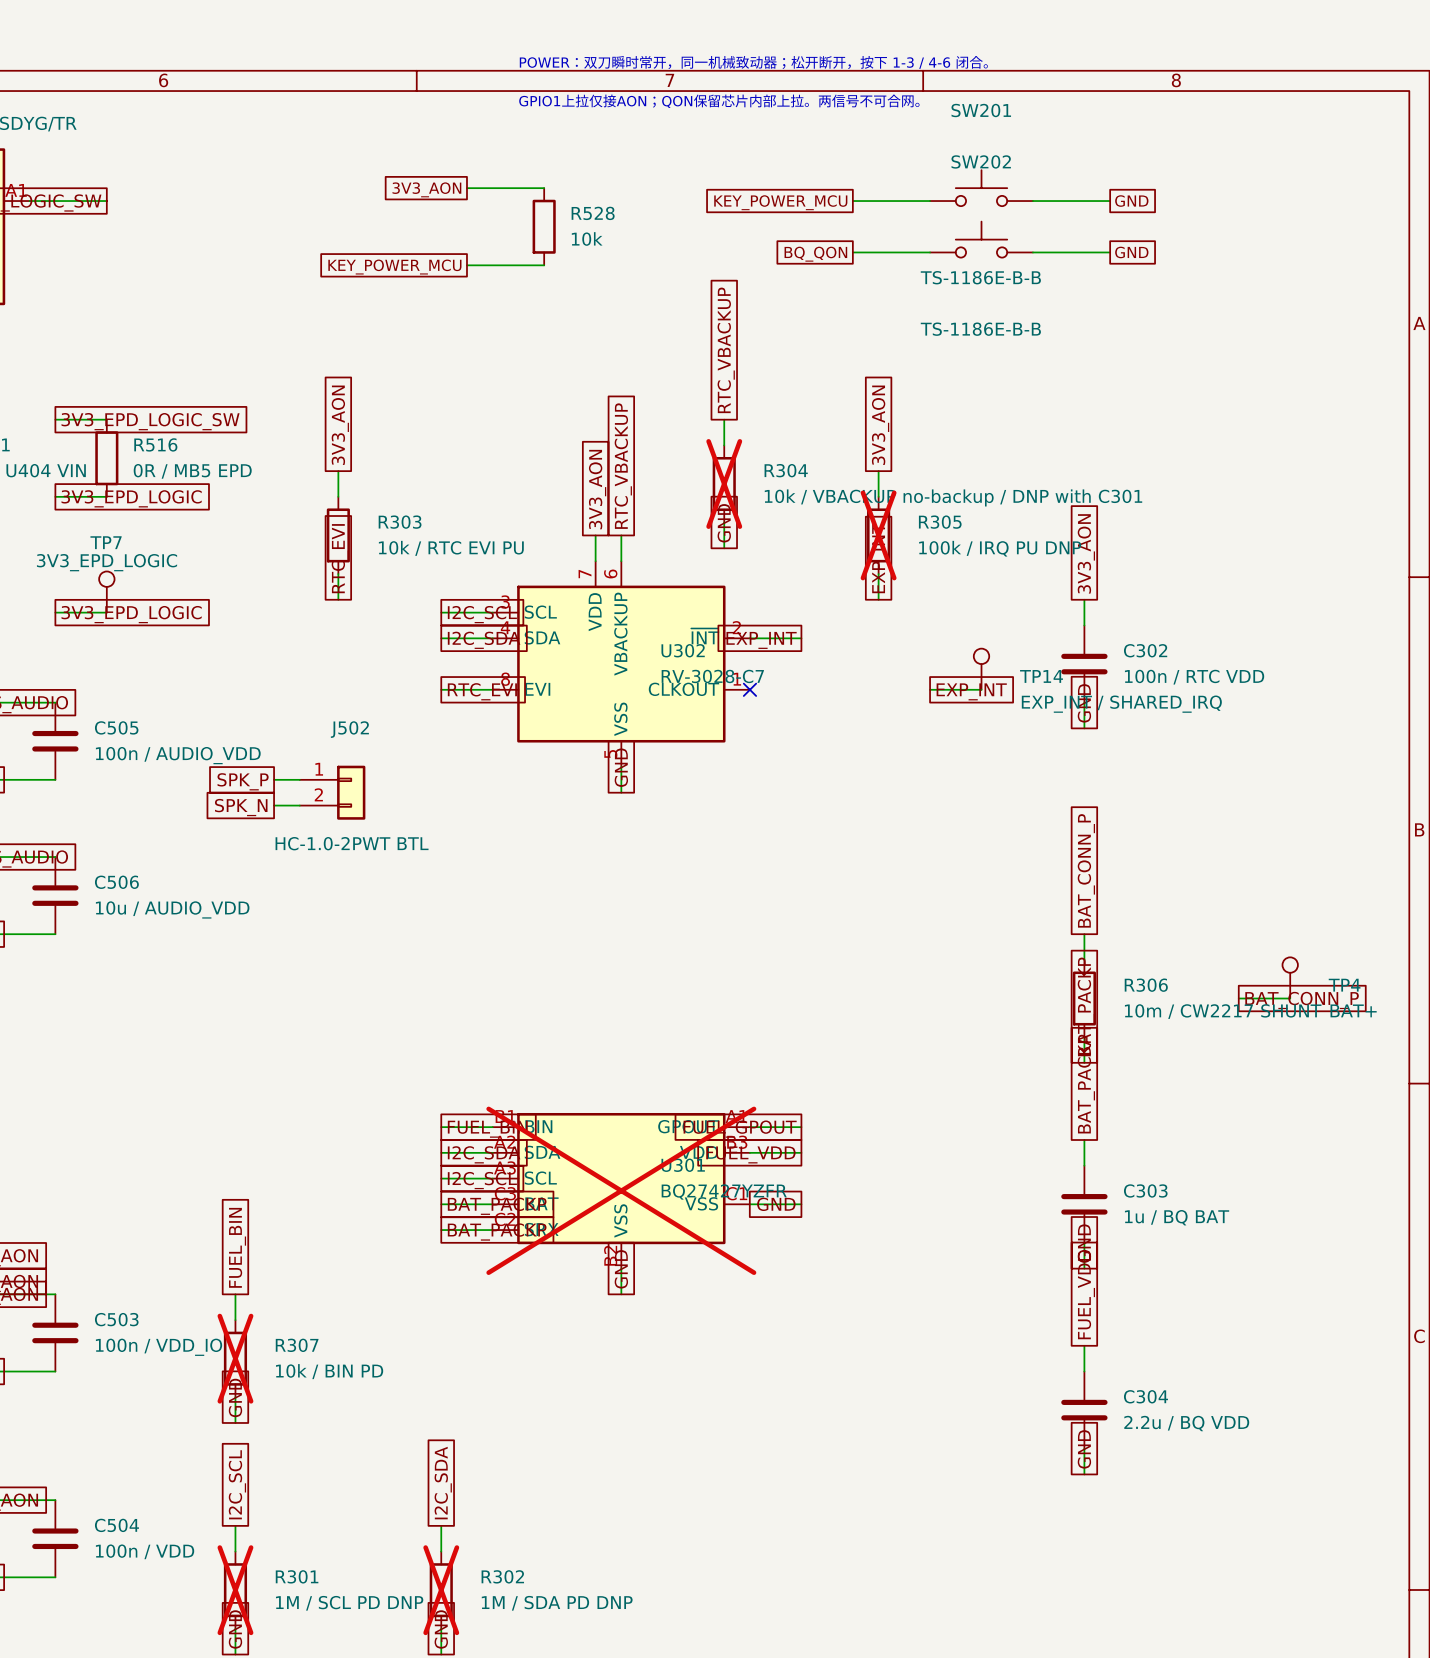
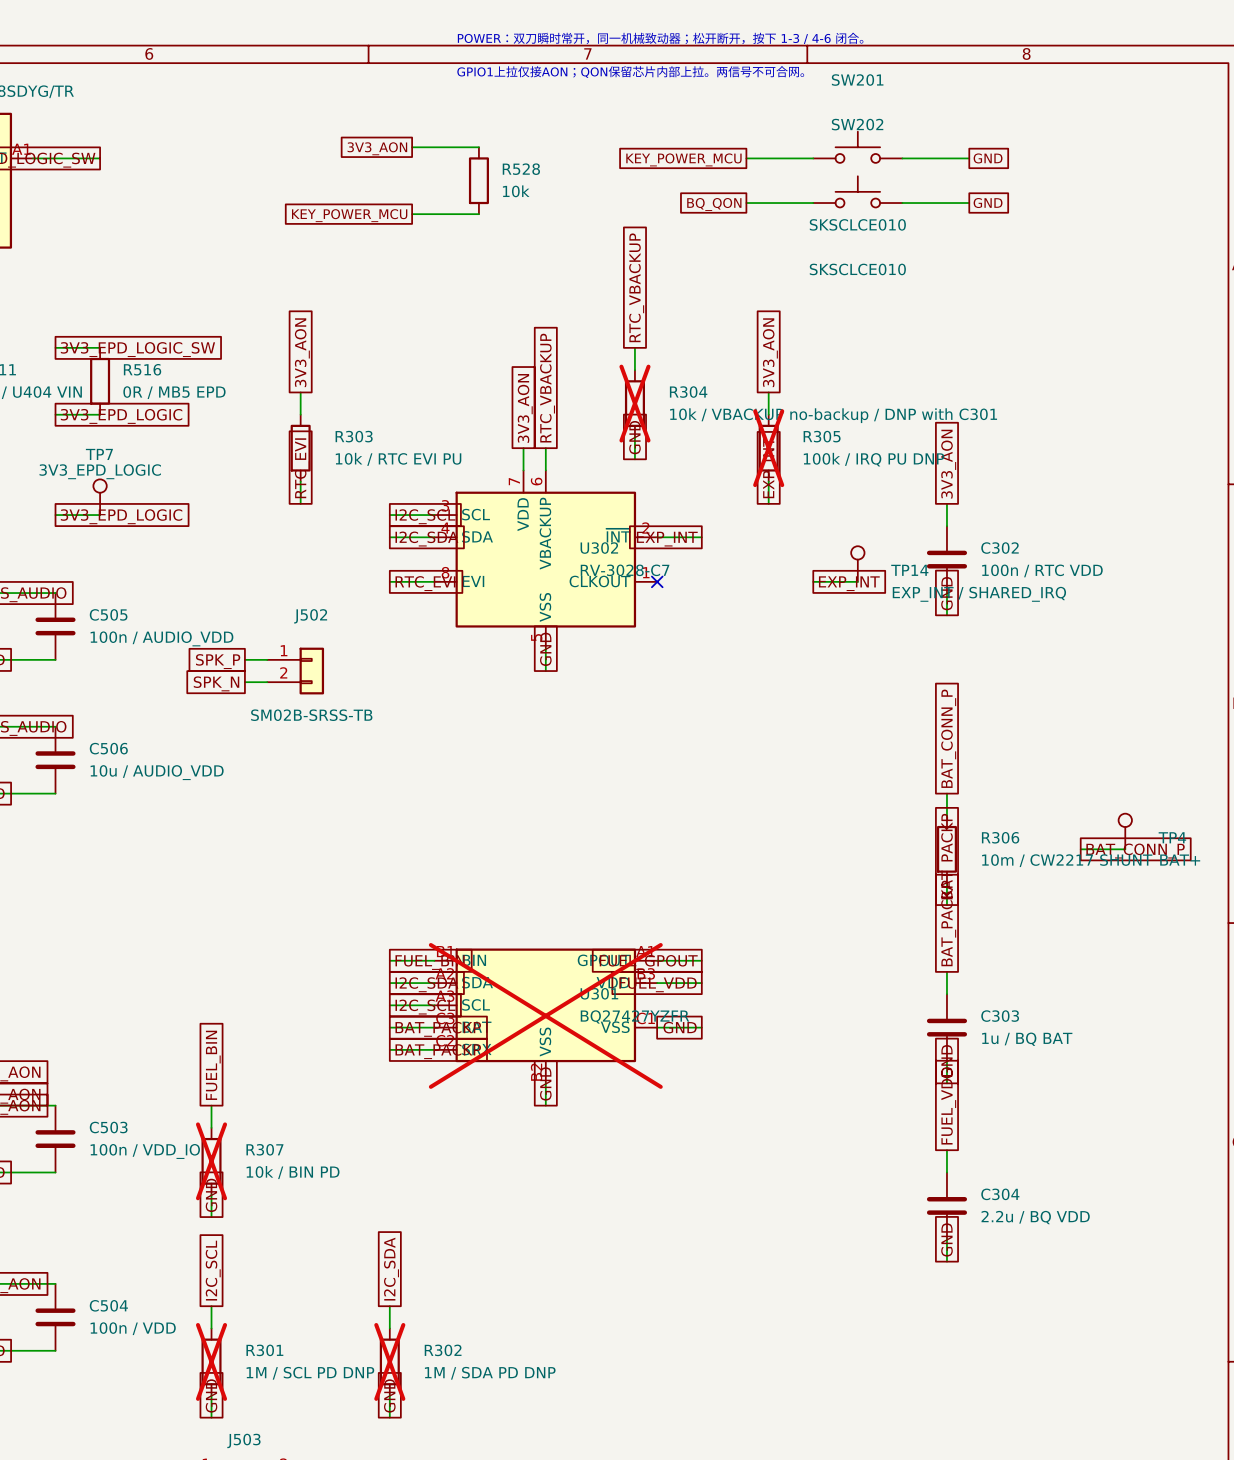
SW201 value: TS-1186E-B-B (980, 277) -> SKSCLCE010 (857, 224)
SW202 value: TS-1186E-B-B (980, 329) -> SKSCLCE010 (857, 269)
J502 value: HC-1.0-2PWT BTL (352, 843) -> SM02B-SRSS-TB (311, 715)

